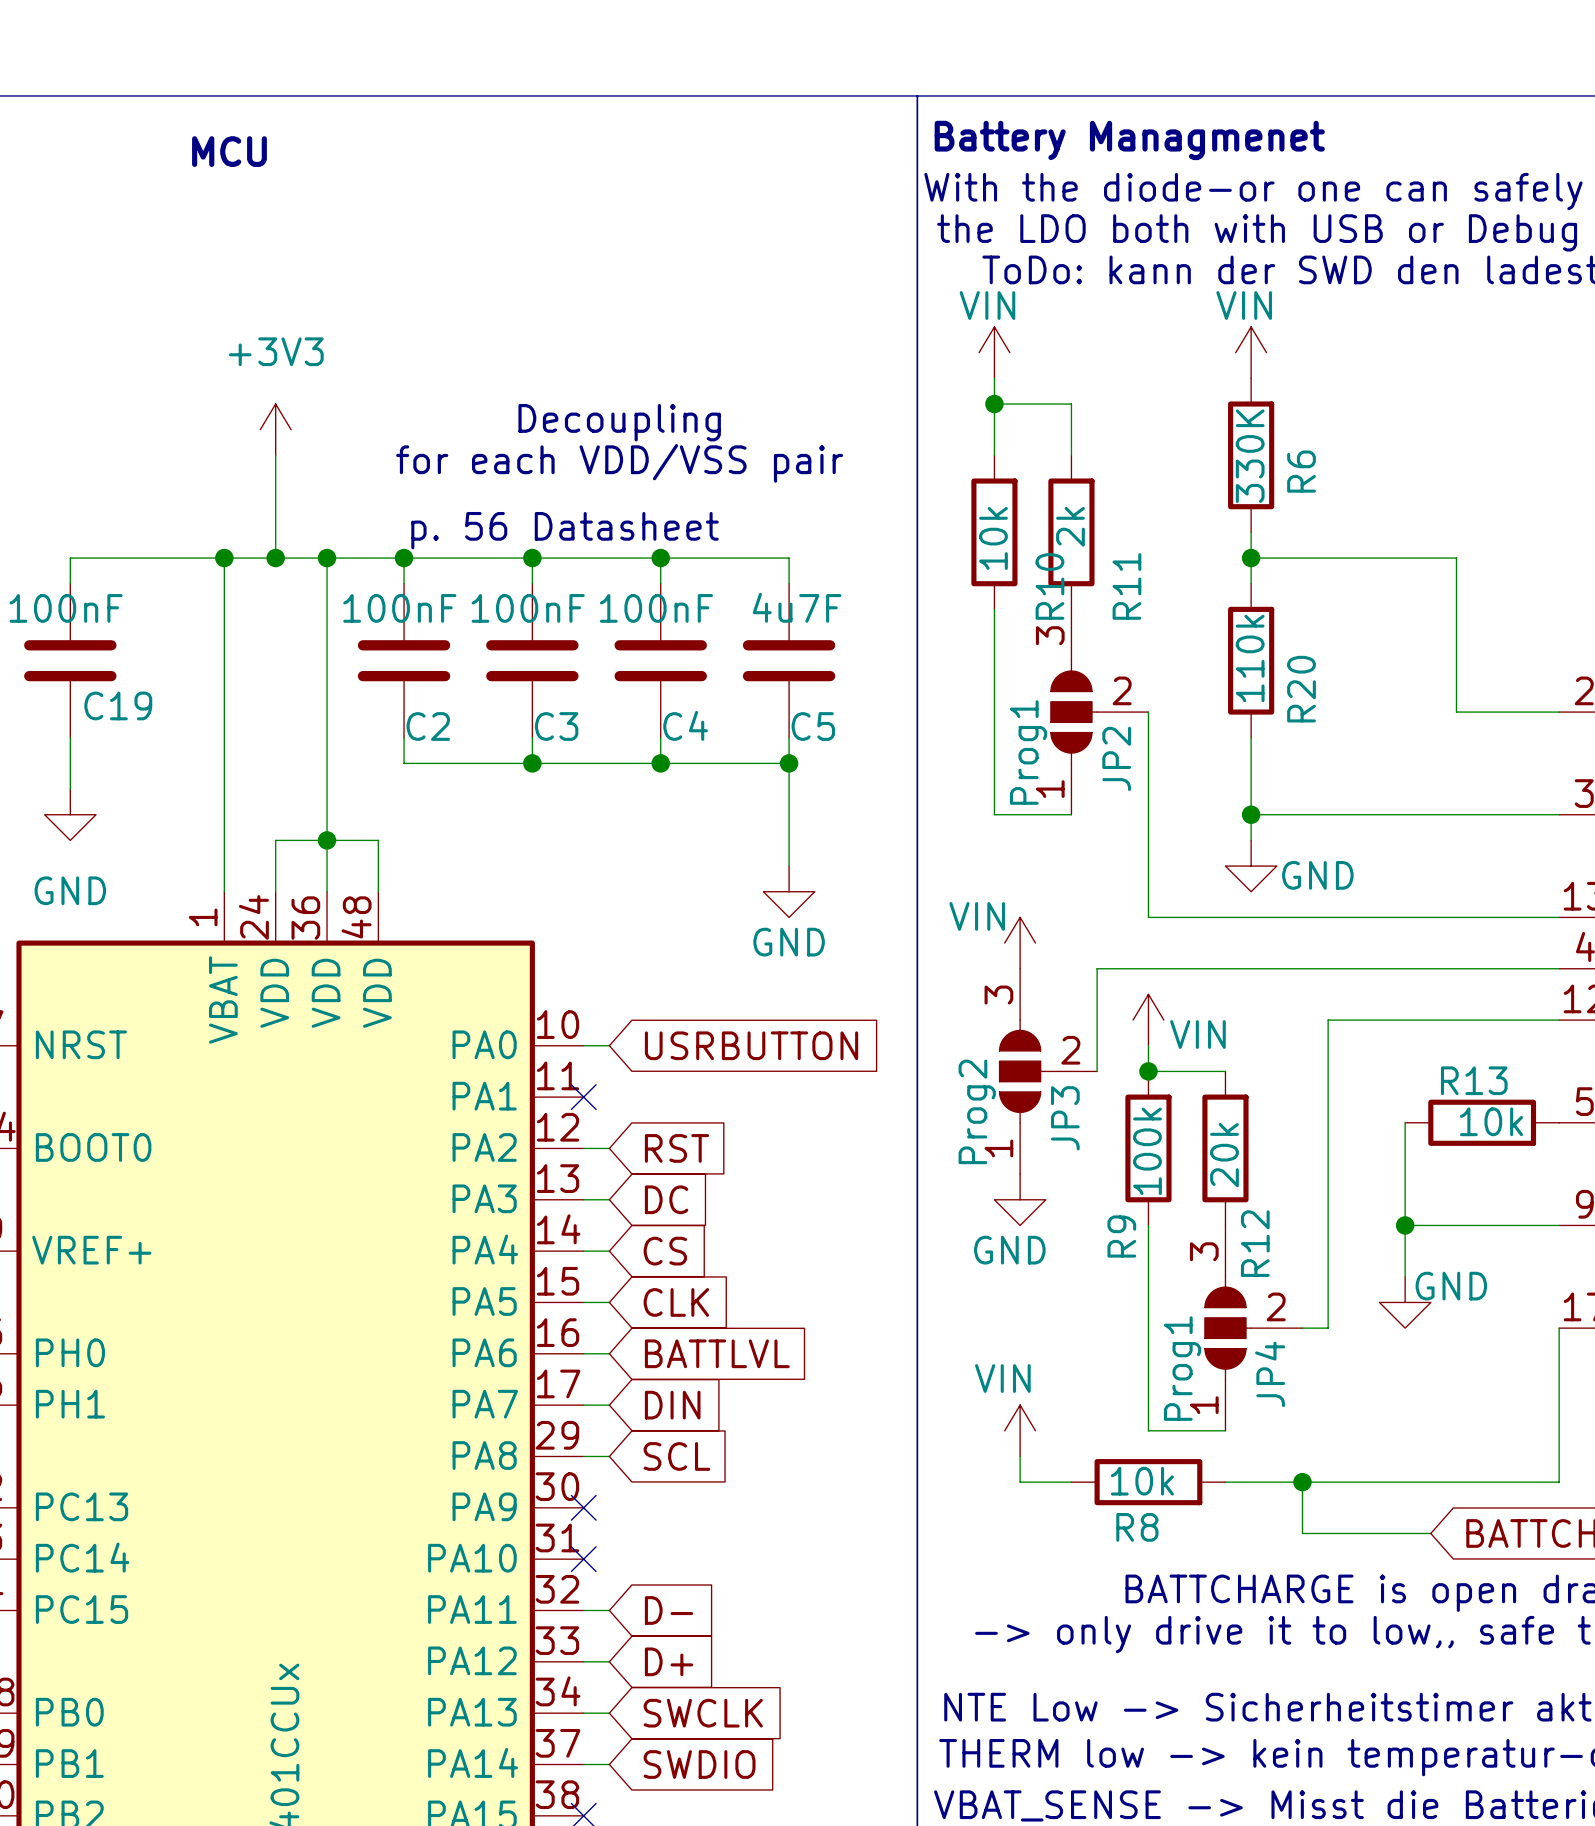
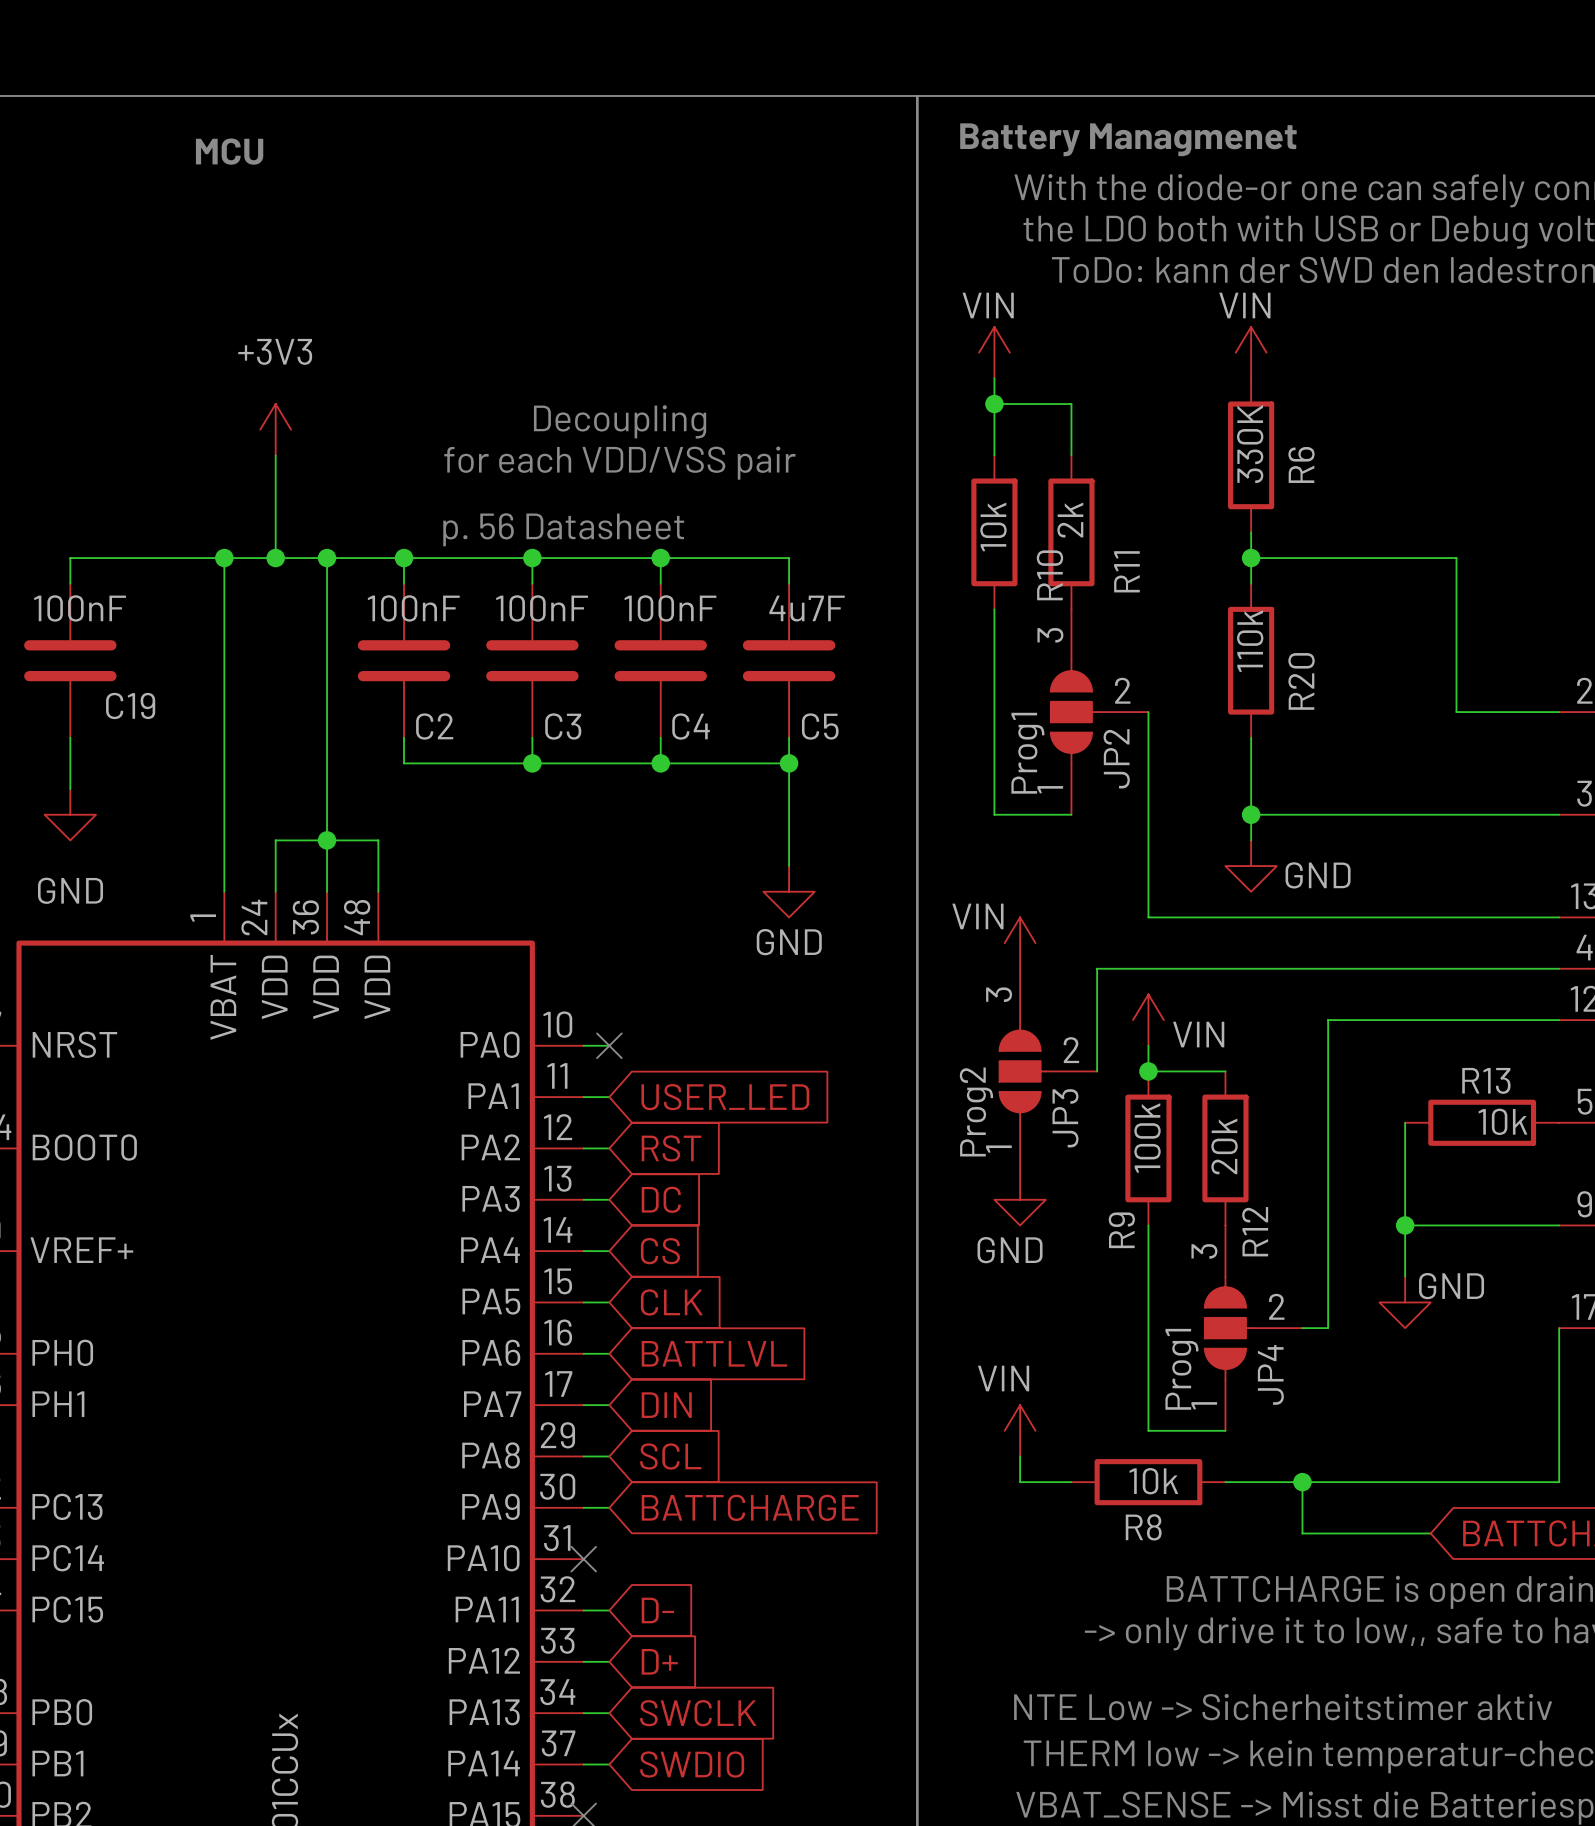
global label: USRBUTTON (751, 1045) -> none
wire: none -> (583, 1097) (609, 1097)
no-connect mark position: (583, 1097) -> (609, 1045)
global label: none -> USER_LED (725, 1097)
wire: none -> (583, 1507) (609, 1507)
no-connect mark: (583, 1507) -> none
global label: none -> BATTCHARGE (750, 1507)

